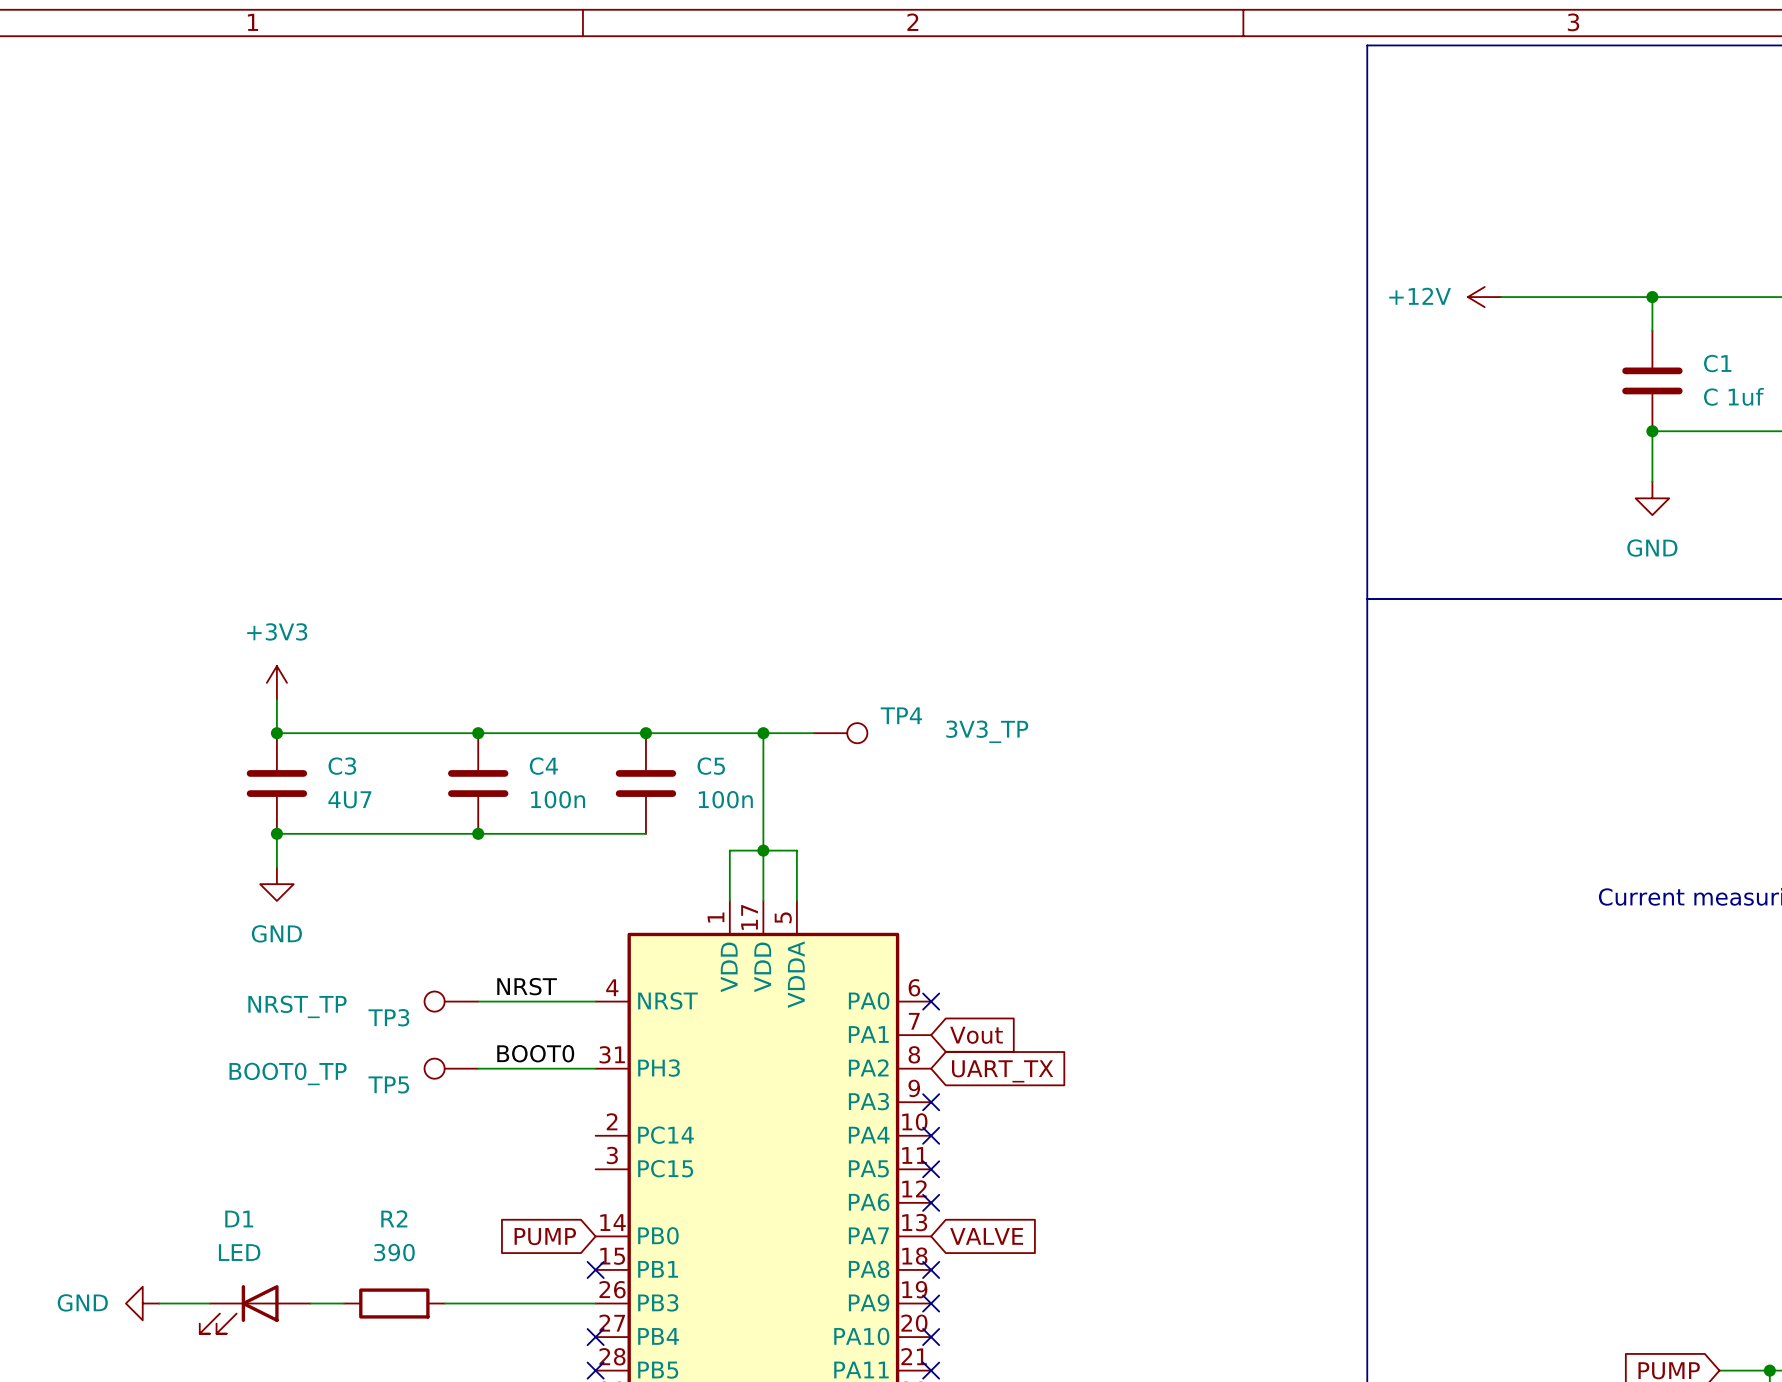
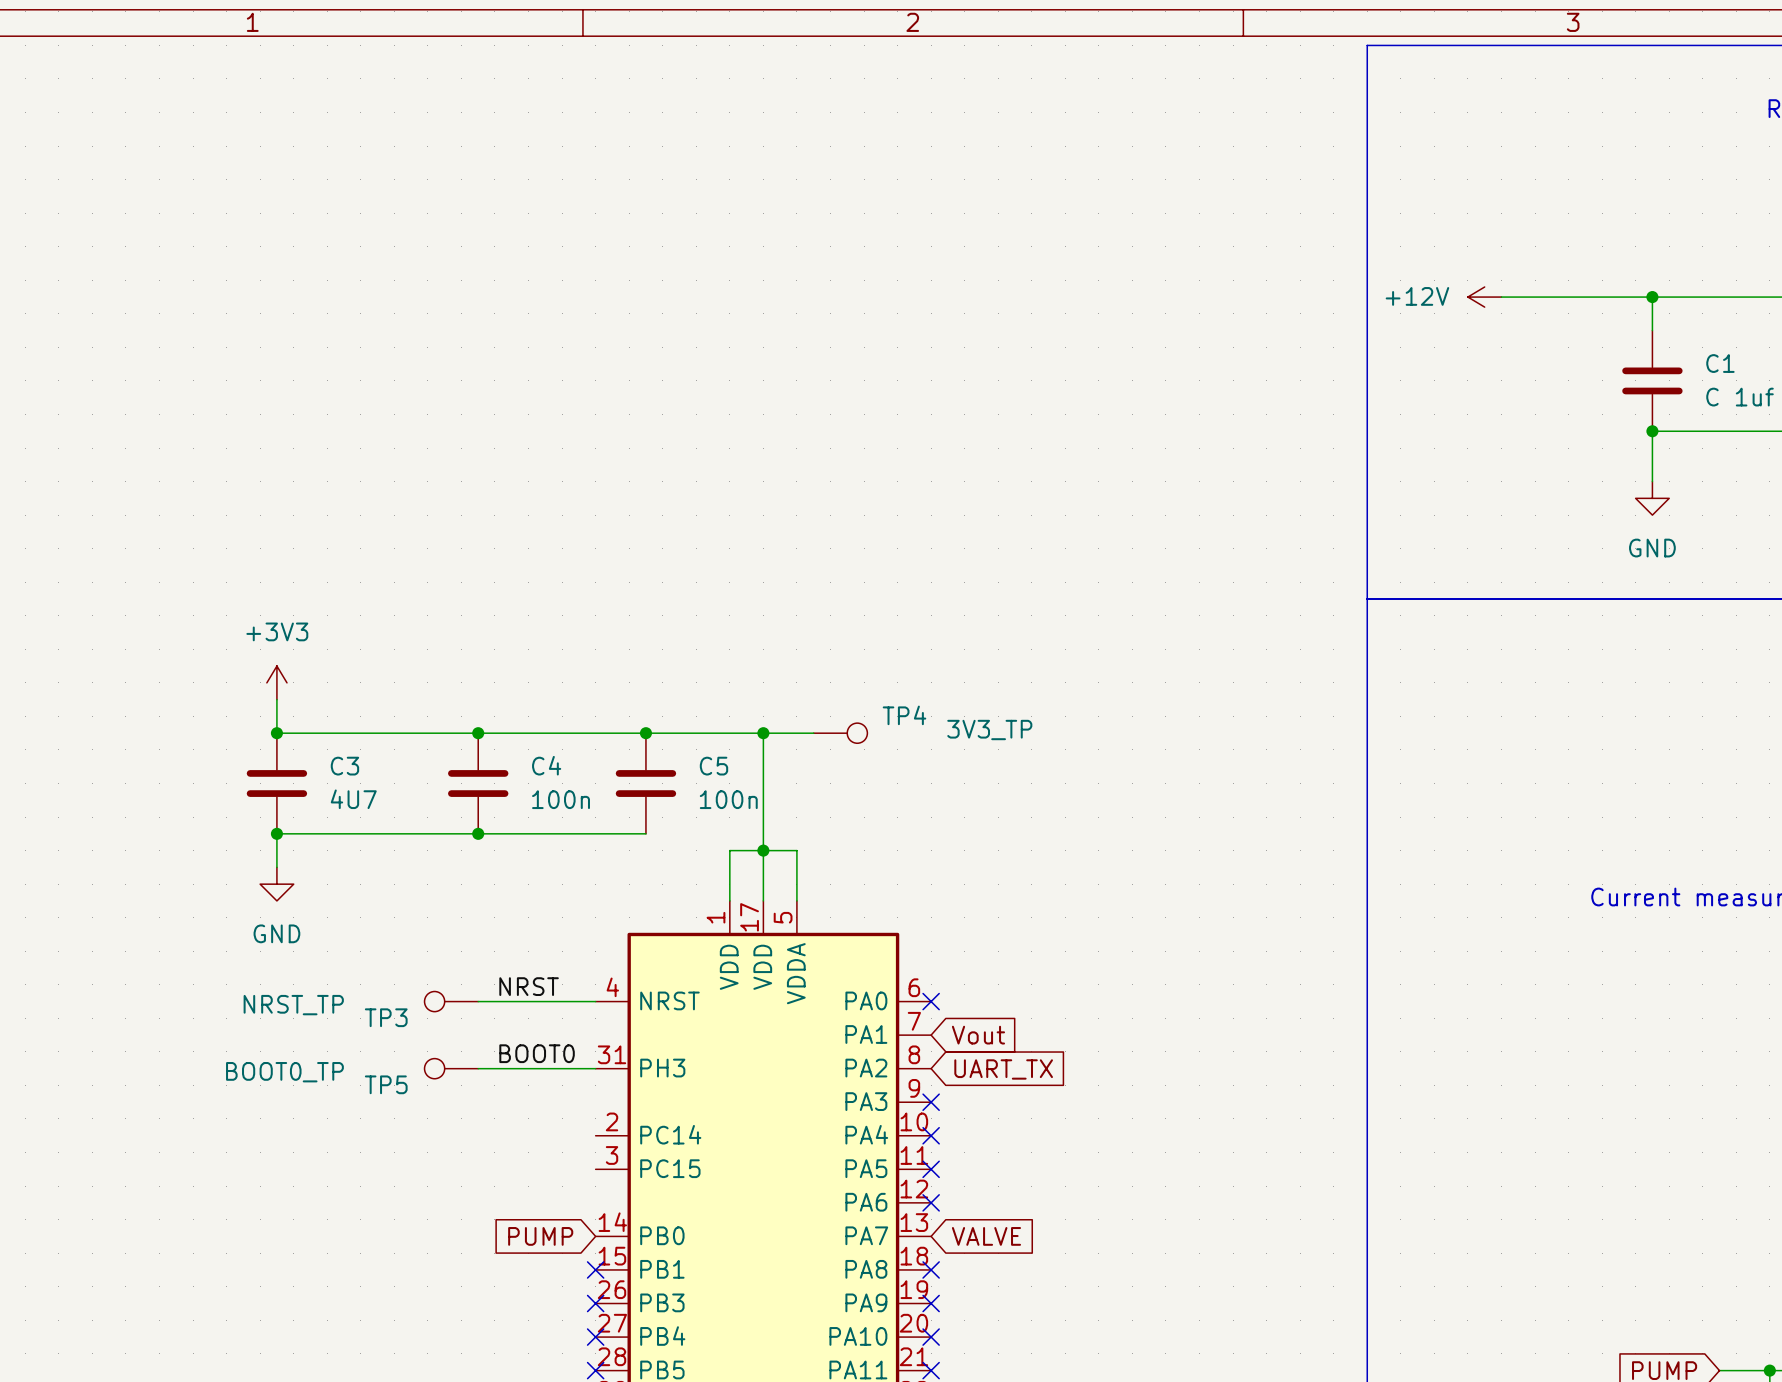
power symbol: GND (142, 1303) -> none
wire: (159, 1303) (209, 1303) -> none
wire: (310, 1303) (344, 1303) -> none
R2: 390 (394, 1303) -> none
wire: (444, 1303) (595, 1303) -> none
no-connect mark: none -> (595, 1303)
D1: LED (255, 1309) -> none

